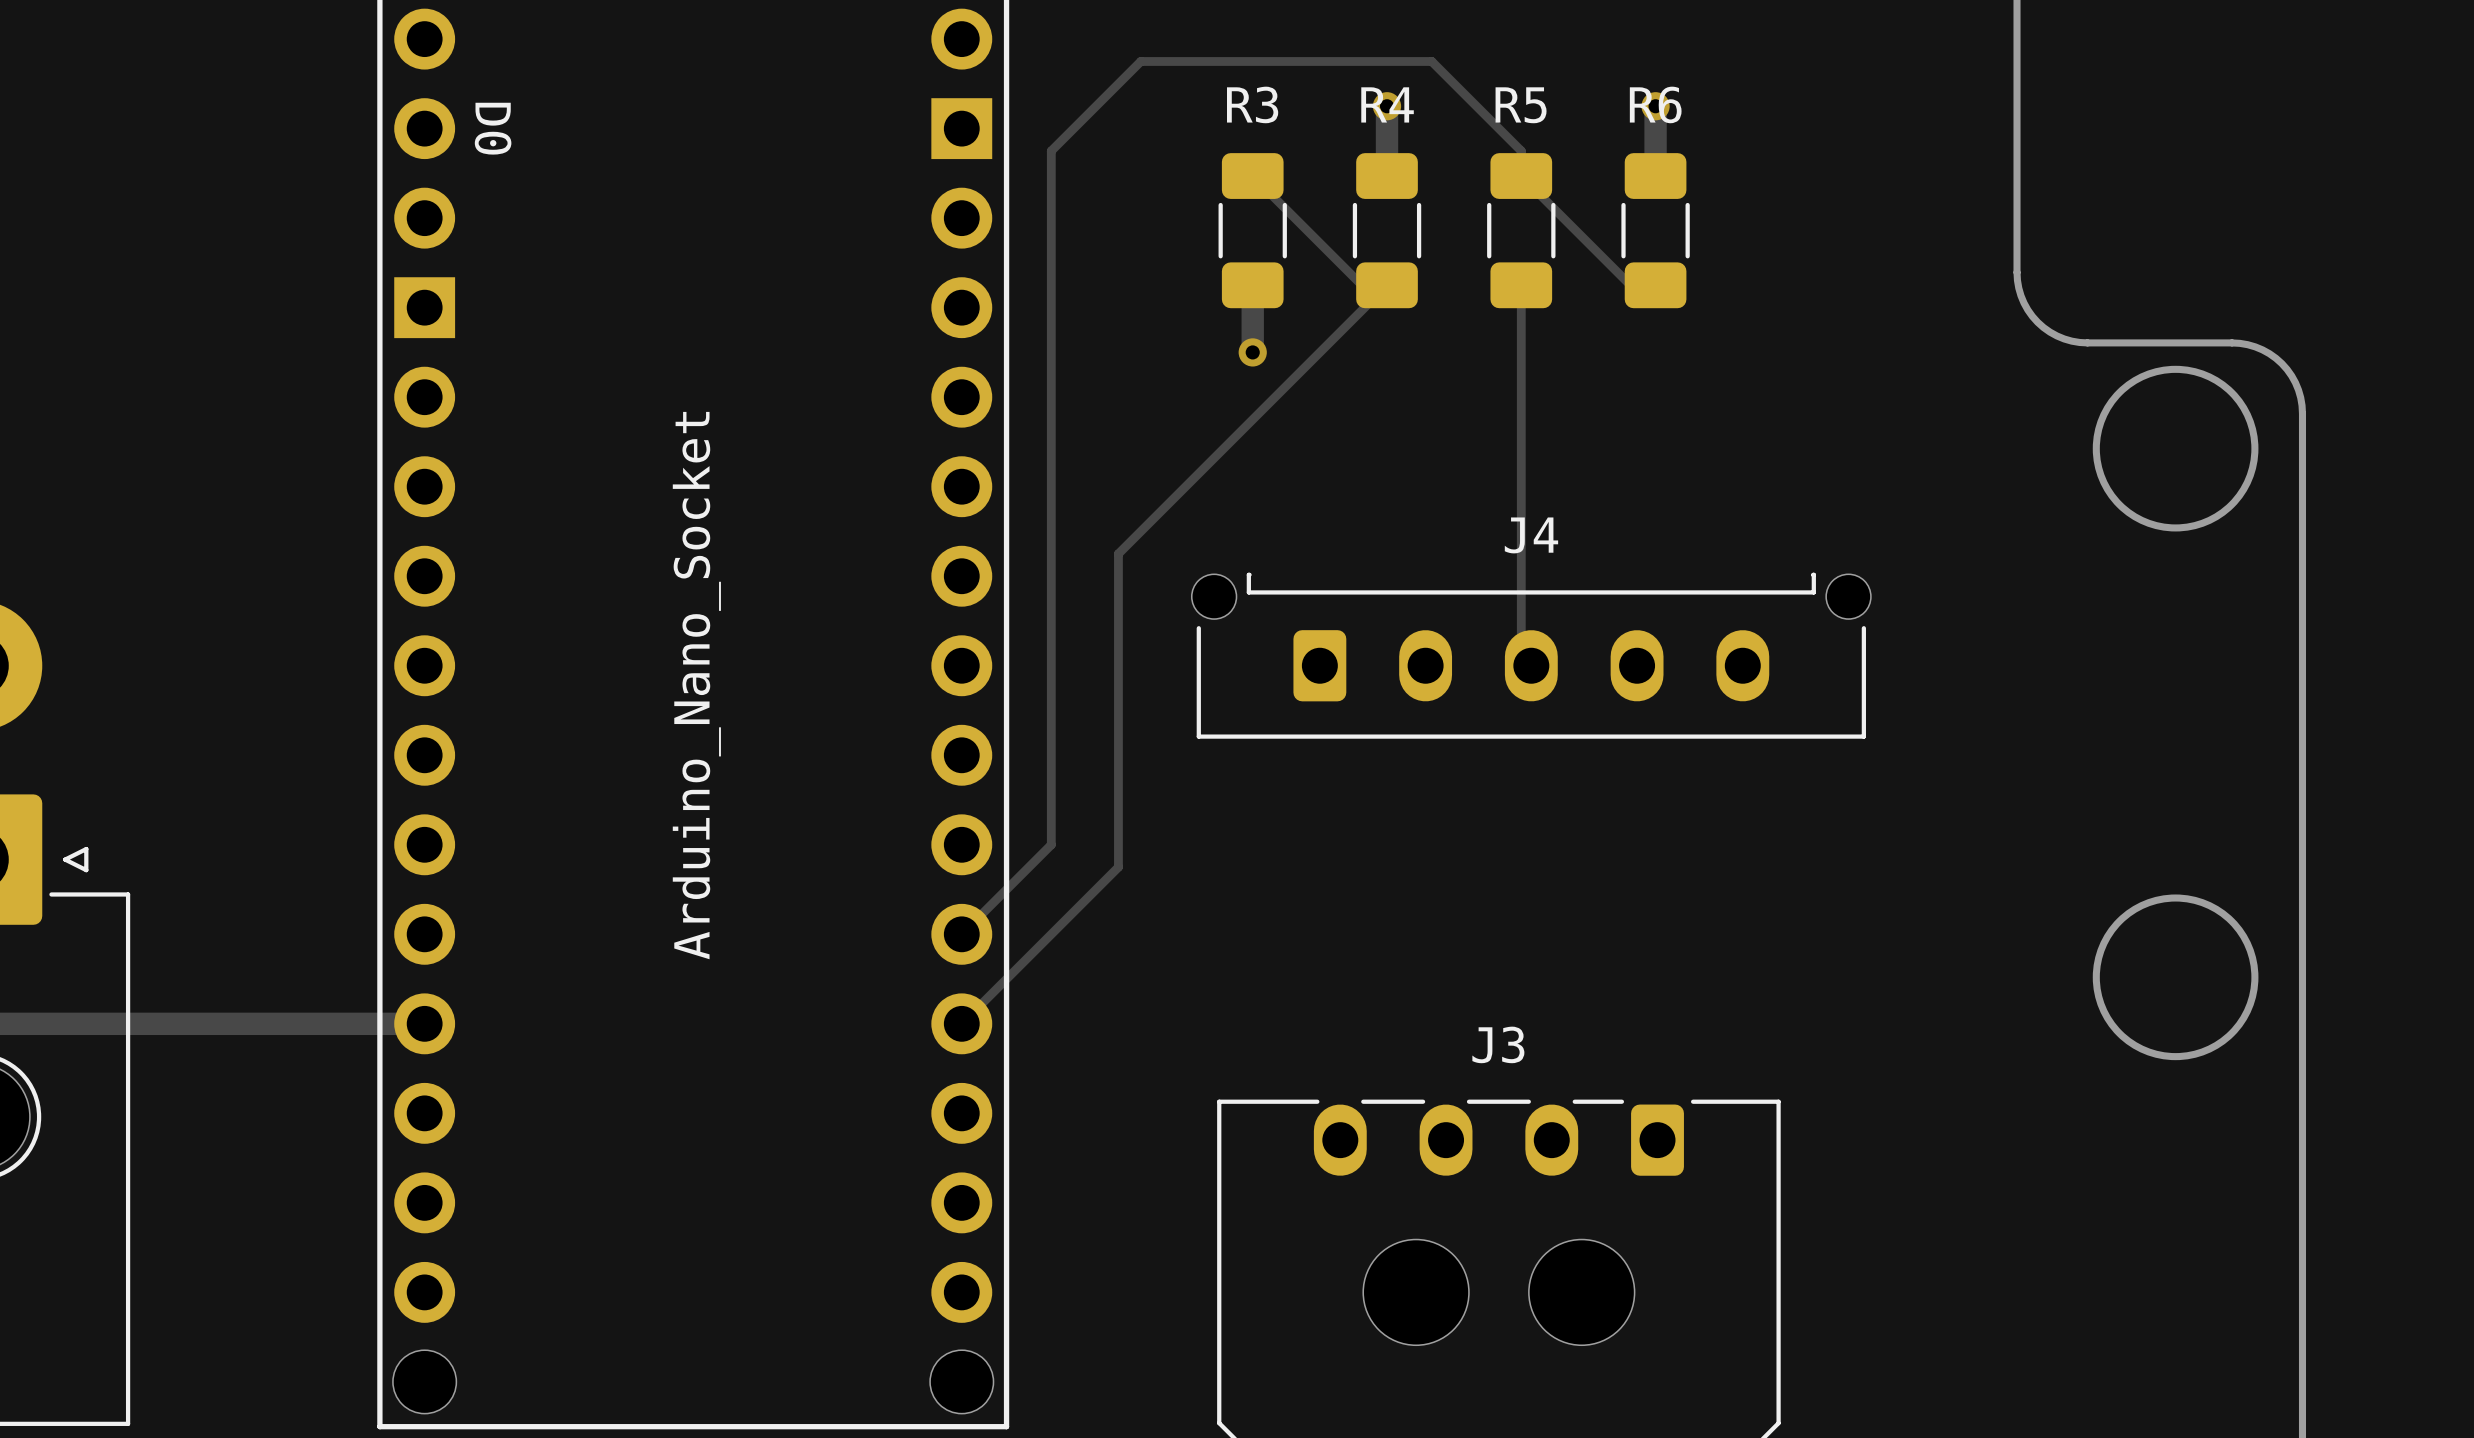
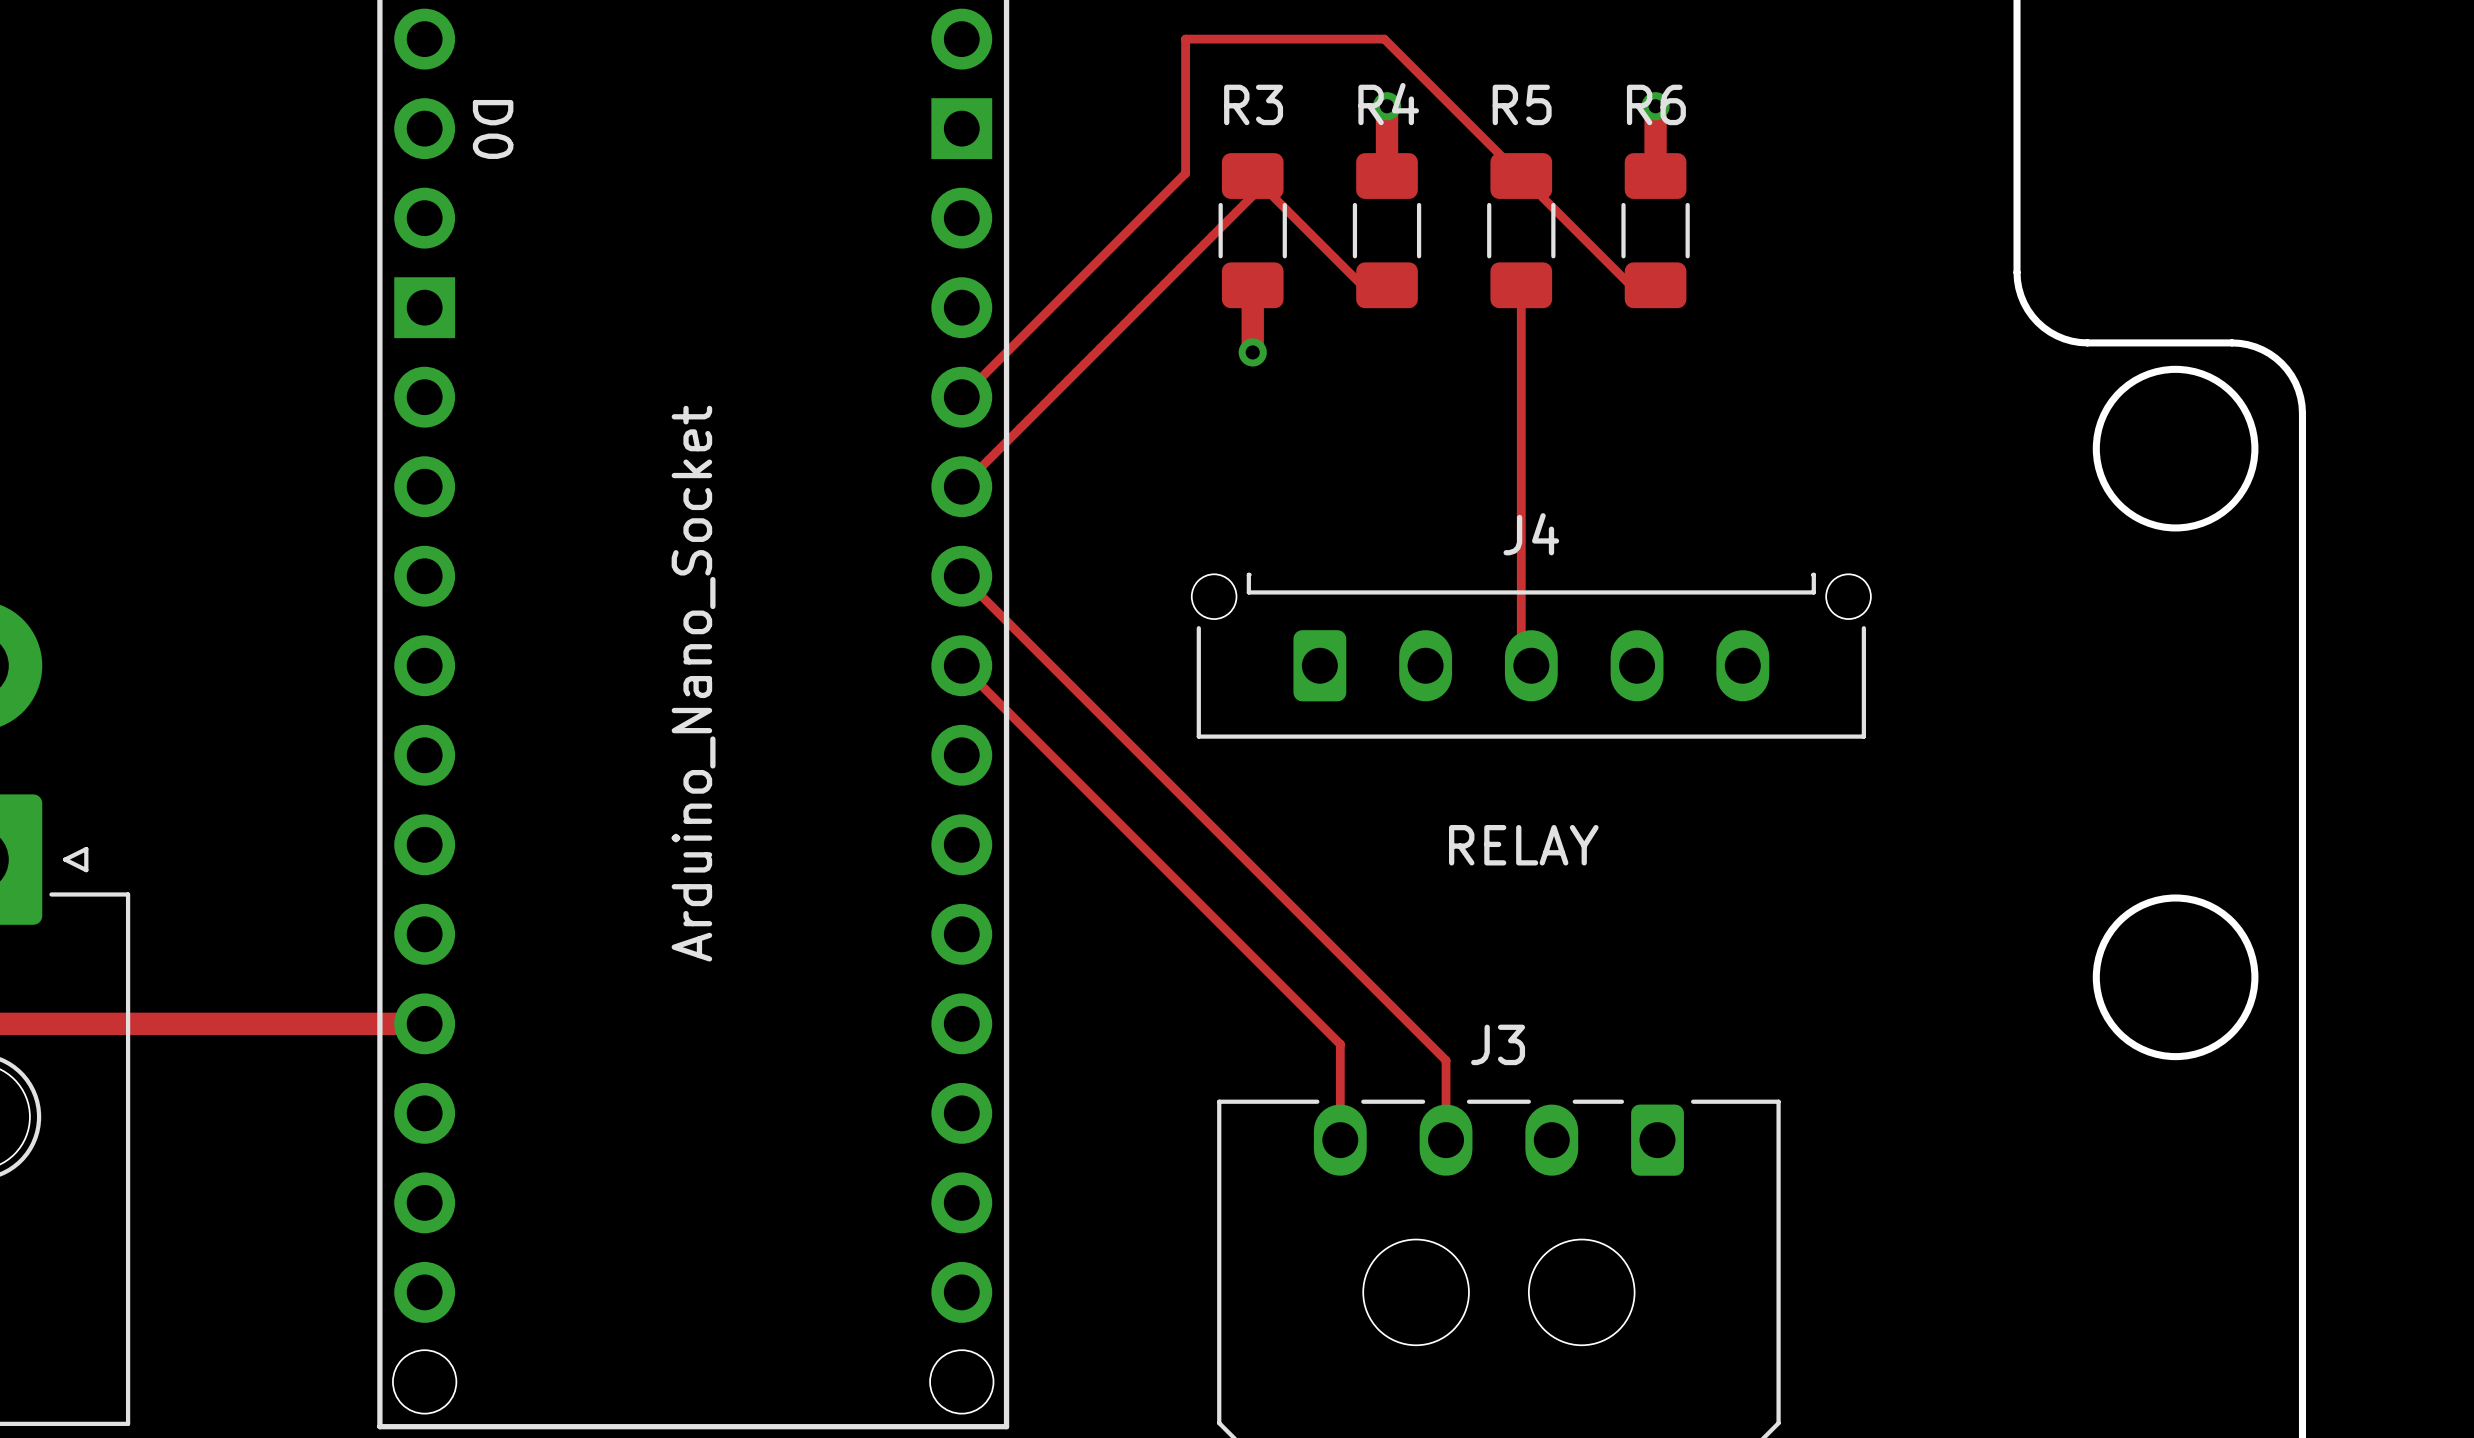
track: none -> (1252, 176) (1252, 195) (961, 486)
track: (1521, 176) (1521, 151) (1431, 61) (1140, 61) (1051, 151) (1051, 844) (961, 934) -> (1521, 176) (1384, 39) (1185, 39) (1185, 173) (961, 397)
track: (1387, 285) (1118, 553) (1118, 867) (961, 1023) -> none
track: none -> (961, 576) (1446, 1060) (1446, 1140)
track: none -> (961, 665) (1340, 1044) (1340, 1140)
text: none -> RELAY (1523, 845)

